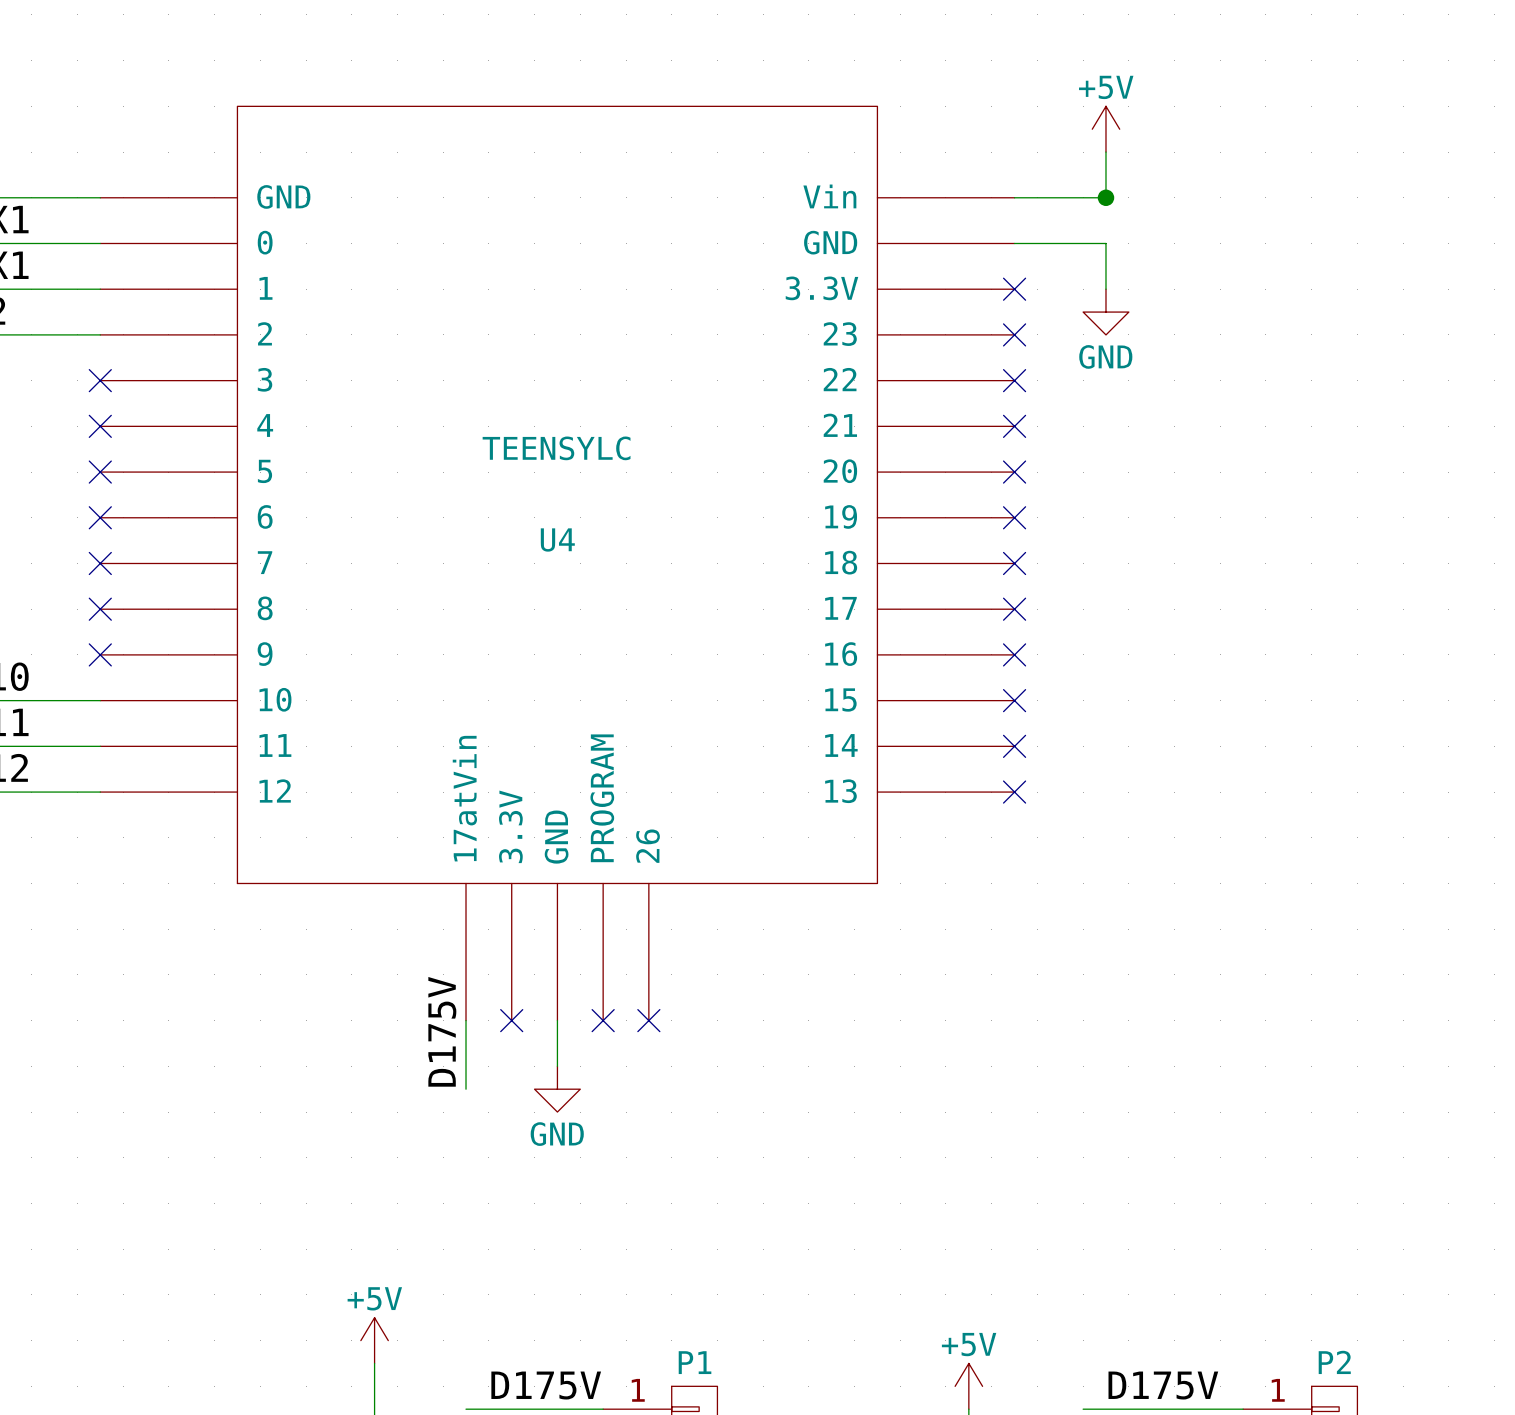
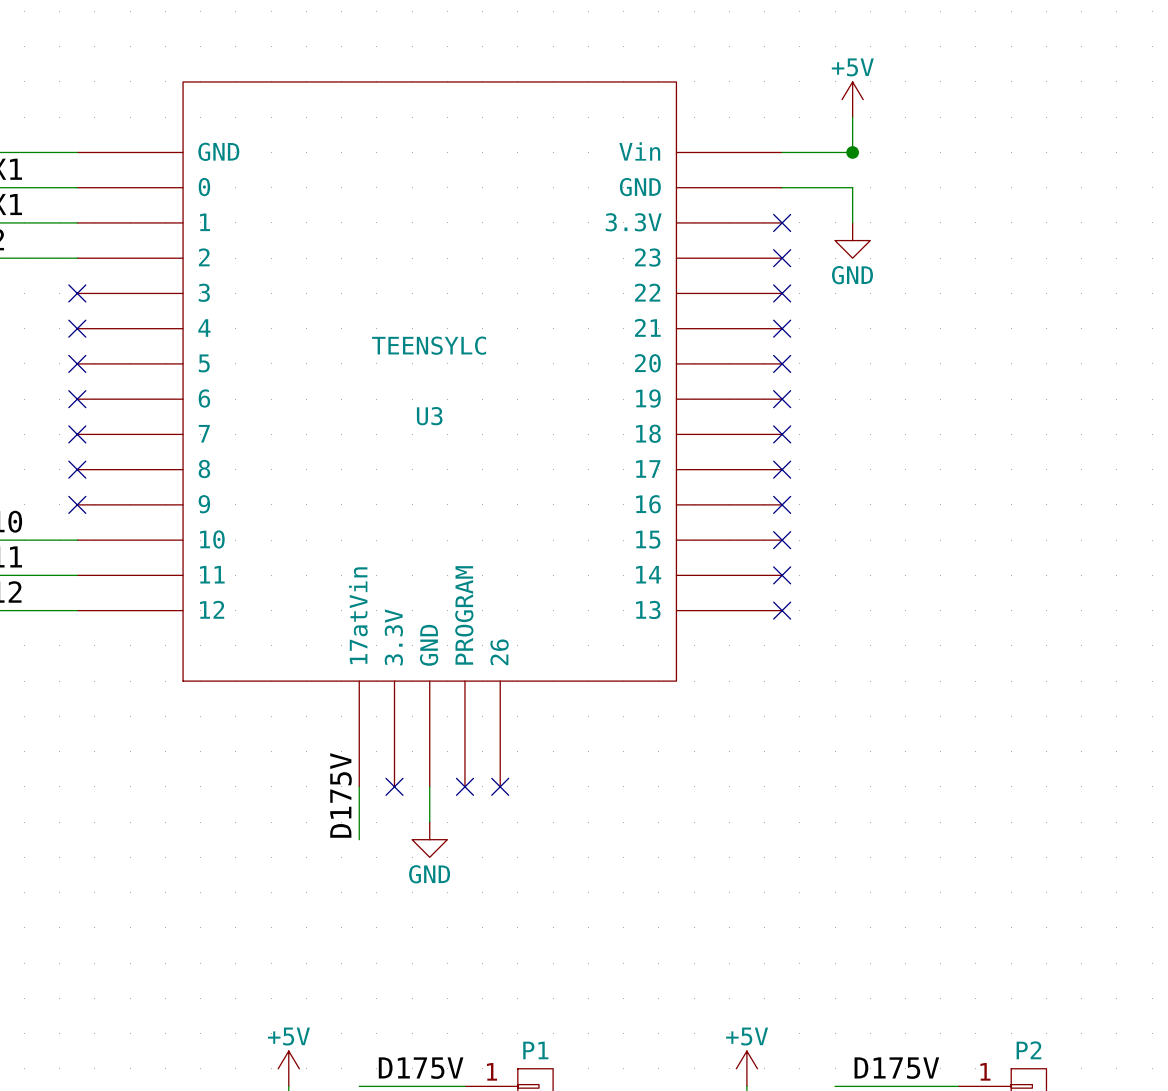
U4 name: U4 (557, 540) -> U3 (429, 416)
power symbol position: +5V (374, 1340) -> +5V (288, 1068)

